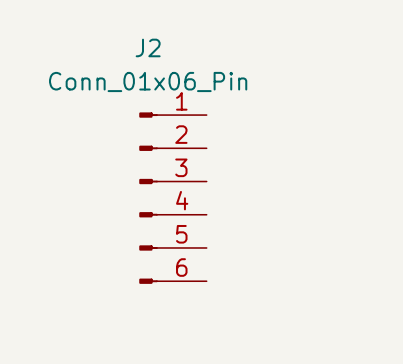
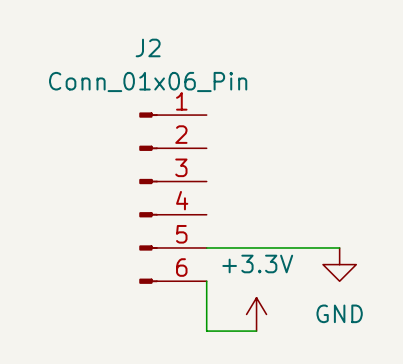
wire: none -> (206, 247) (339, 247)
power symbol: none -> GND (339, 264)
wire: none -> (206, 281) (206, 331) (256, 331)
power symbol: none -> +3.3V (256, 314)

